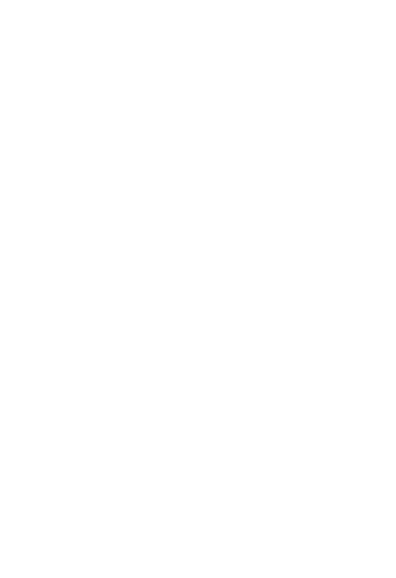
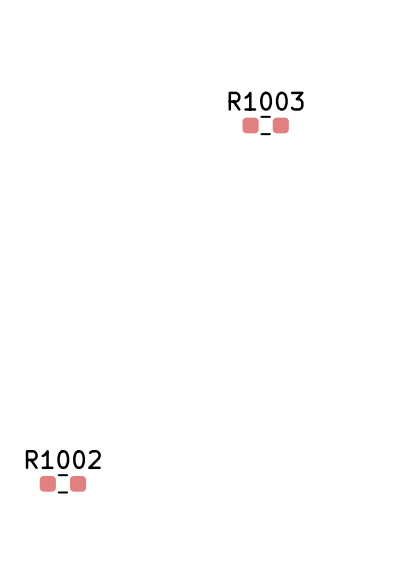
R1003: none -> (265, 125)
R1002: none -> (62, 483)

